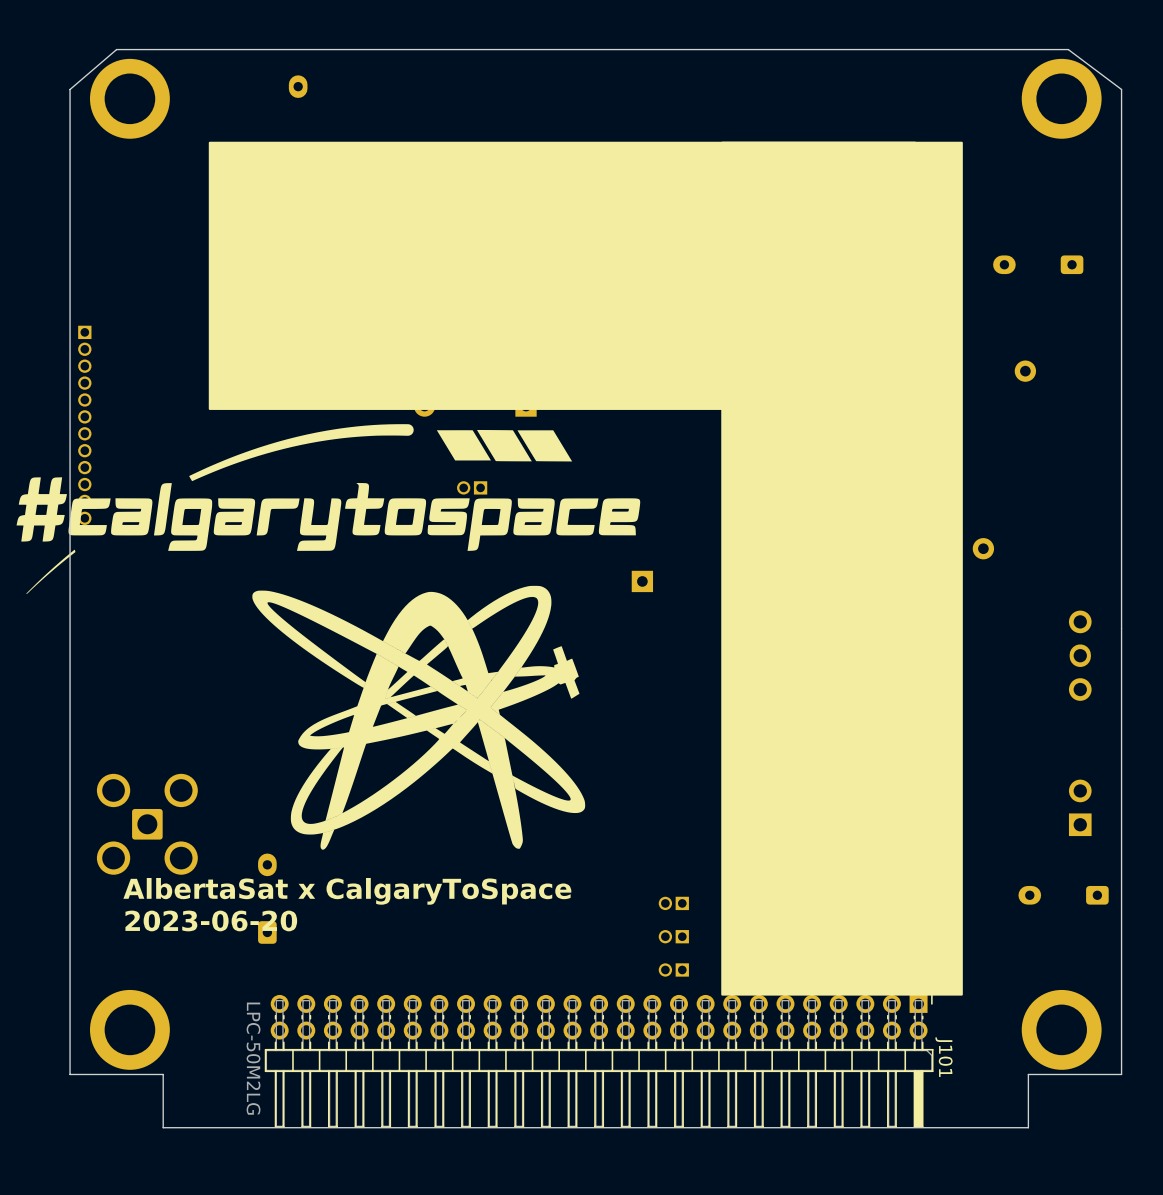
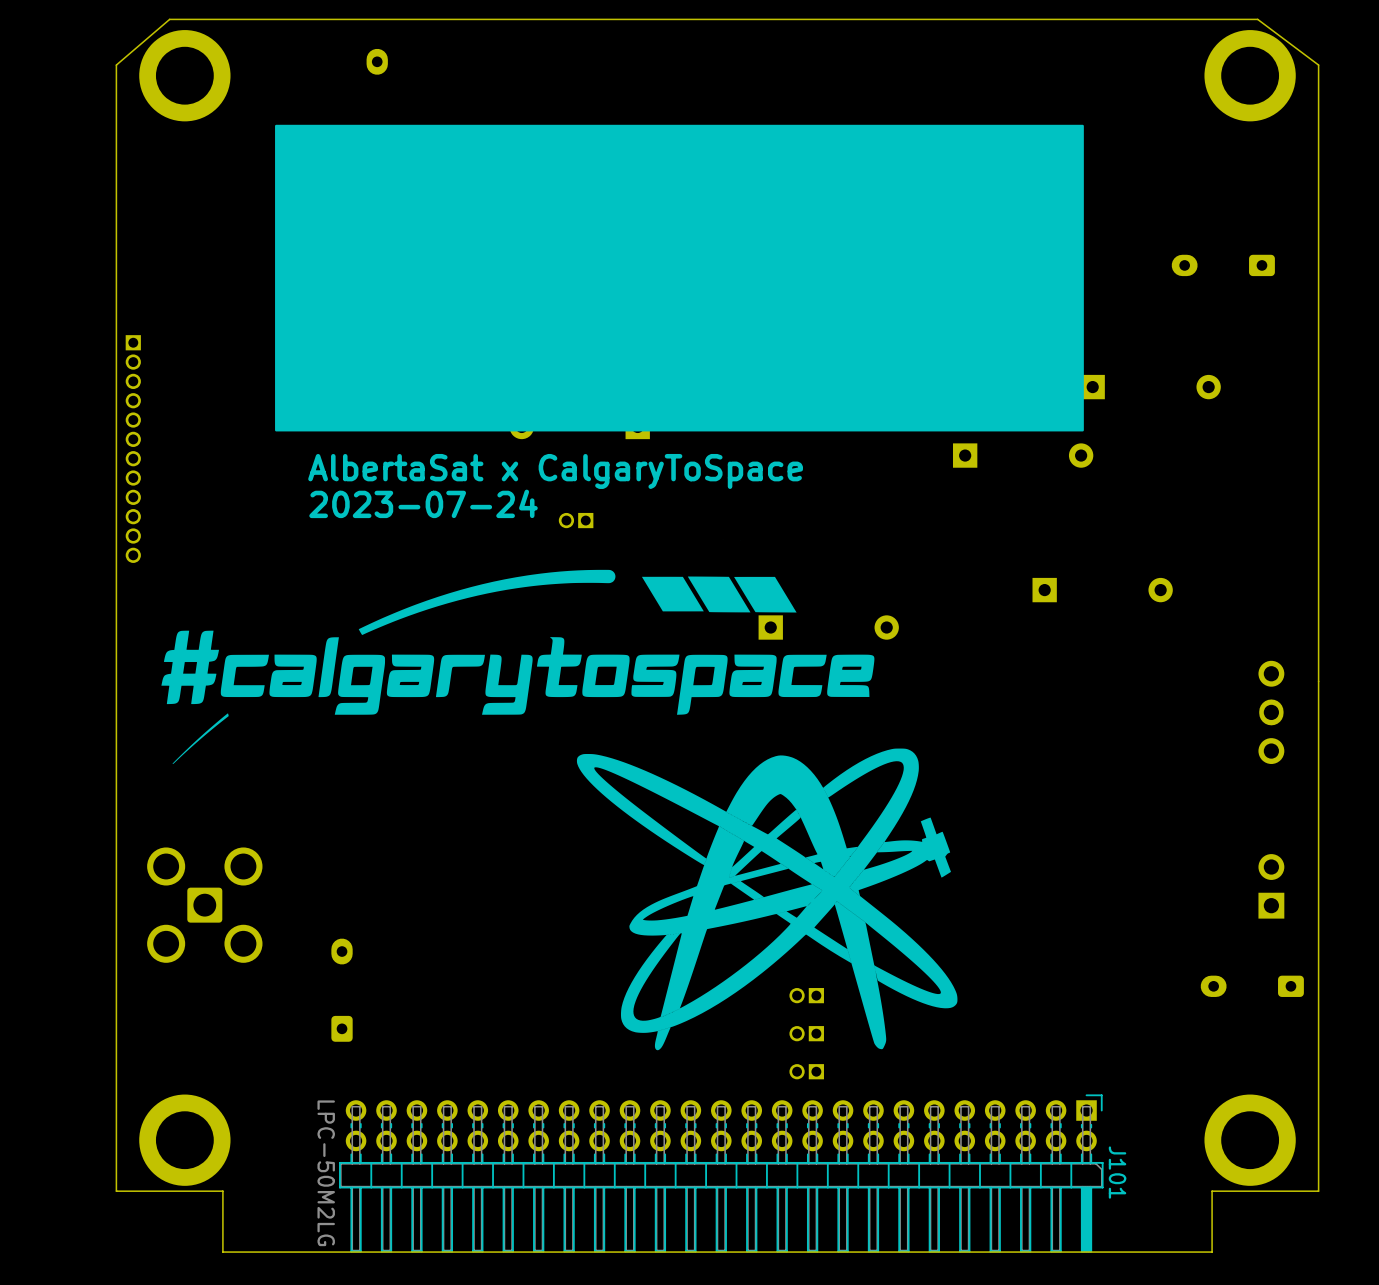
drawing: [721, 141, 963, 996] -> none
text: none -> AlbertaSat x CalgaryToSpace (555, 471)
text: none -> 2023-07-24 (423, 503)
drawing position: (328, 495) -> (517, 651)
drawing position: (418, 717) -> (767, 899)
text: AlbertaSat x CalgaryToSpace (347, 891) -> none
text: 2023-06-20 (211, 920) -> none

